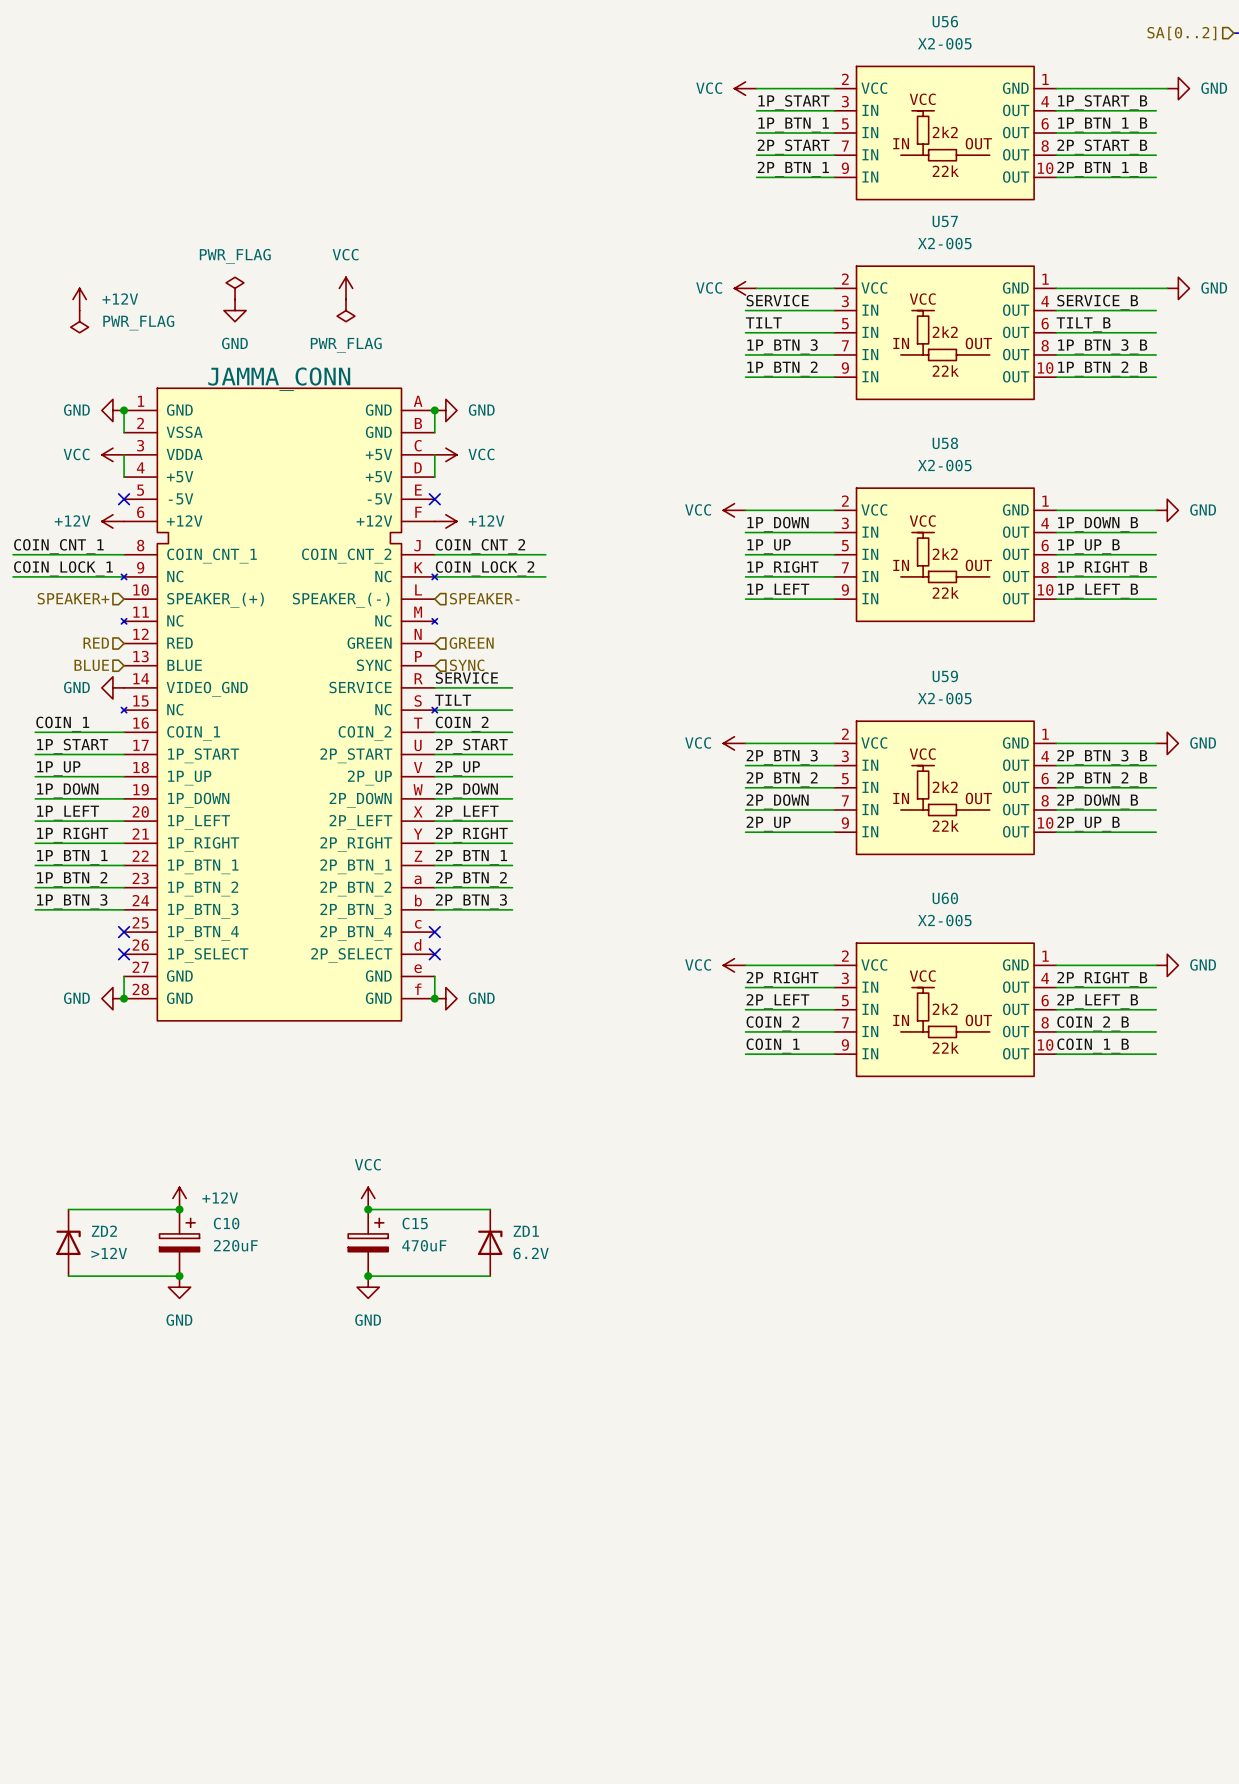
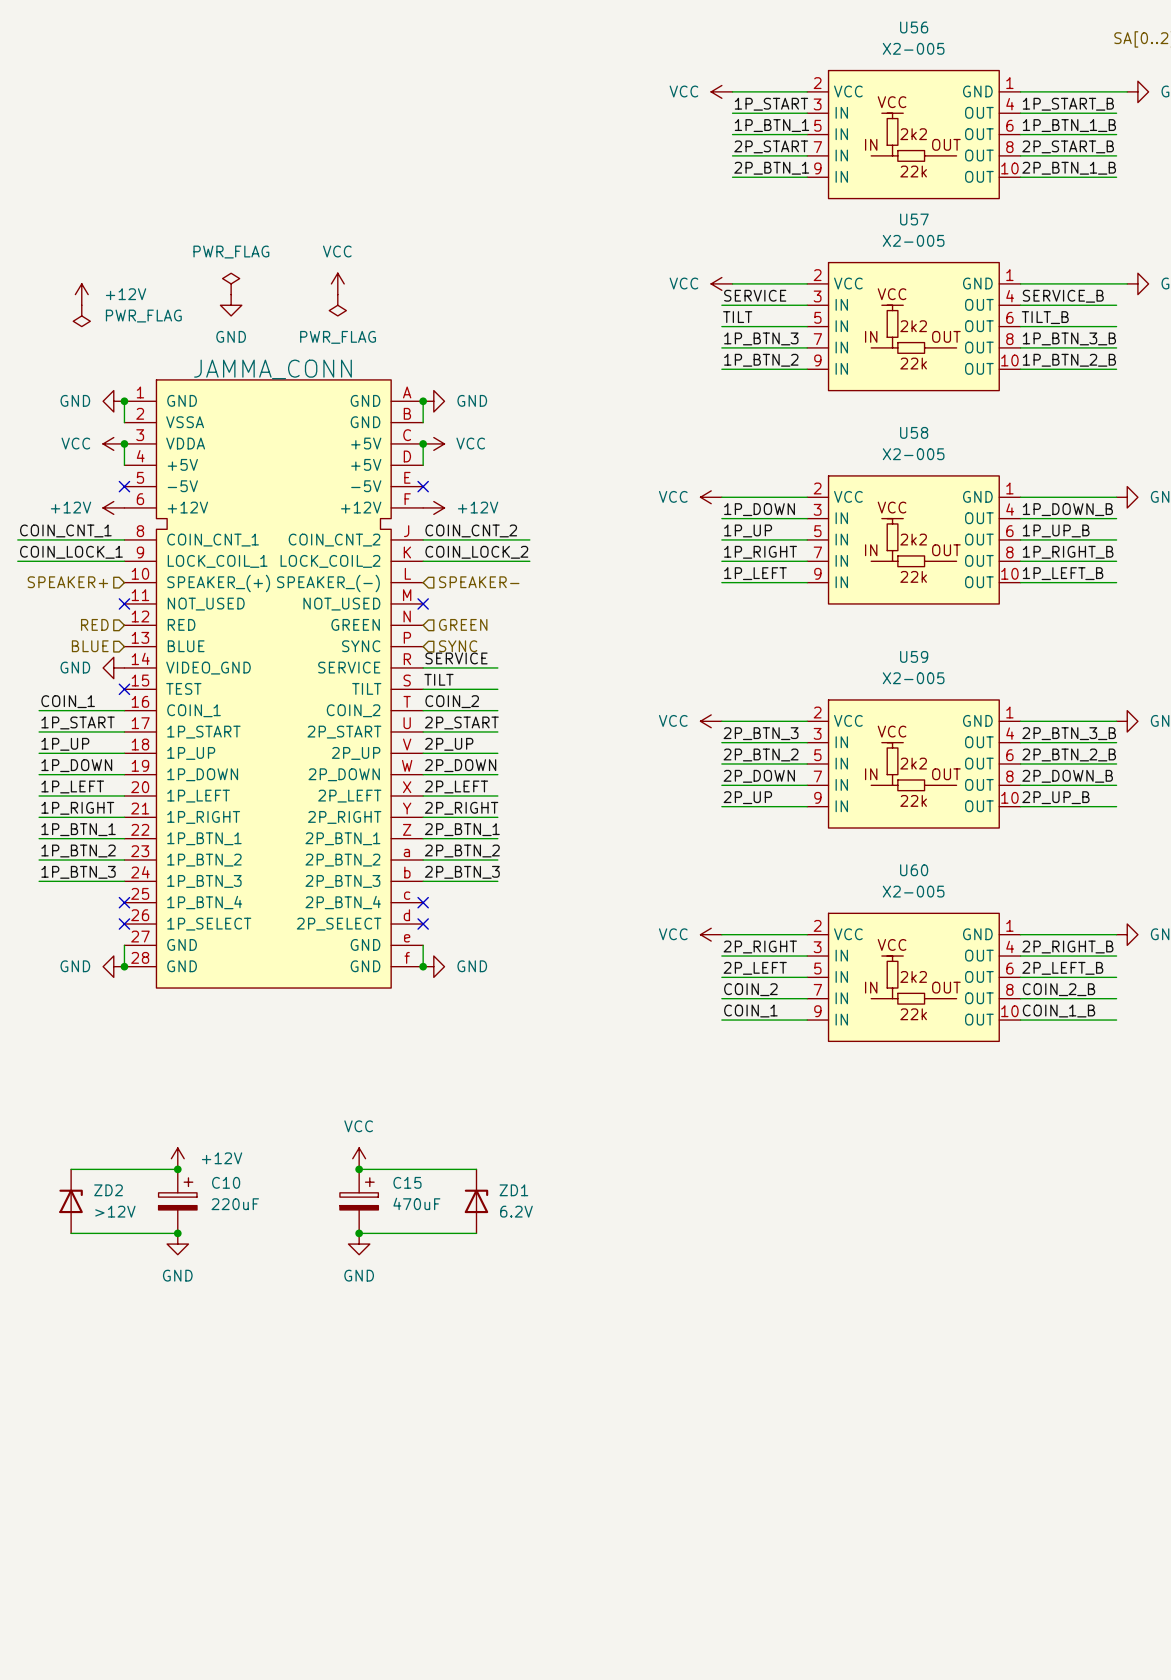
part symbol: [121, 388, 438, 1021] -> [124, 379, 424, 989]
junction: none -> (124, 443)
junction: none -> (423, 443)
no-connect mark: none -> (124, 603)
no-connect mark: none -> (423, 603)
no-connect mark: none -> (124, 689)

